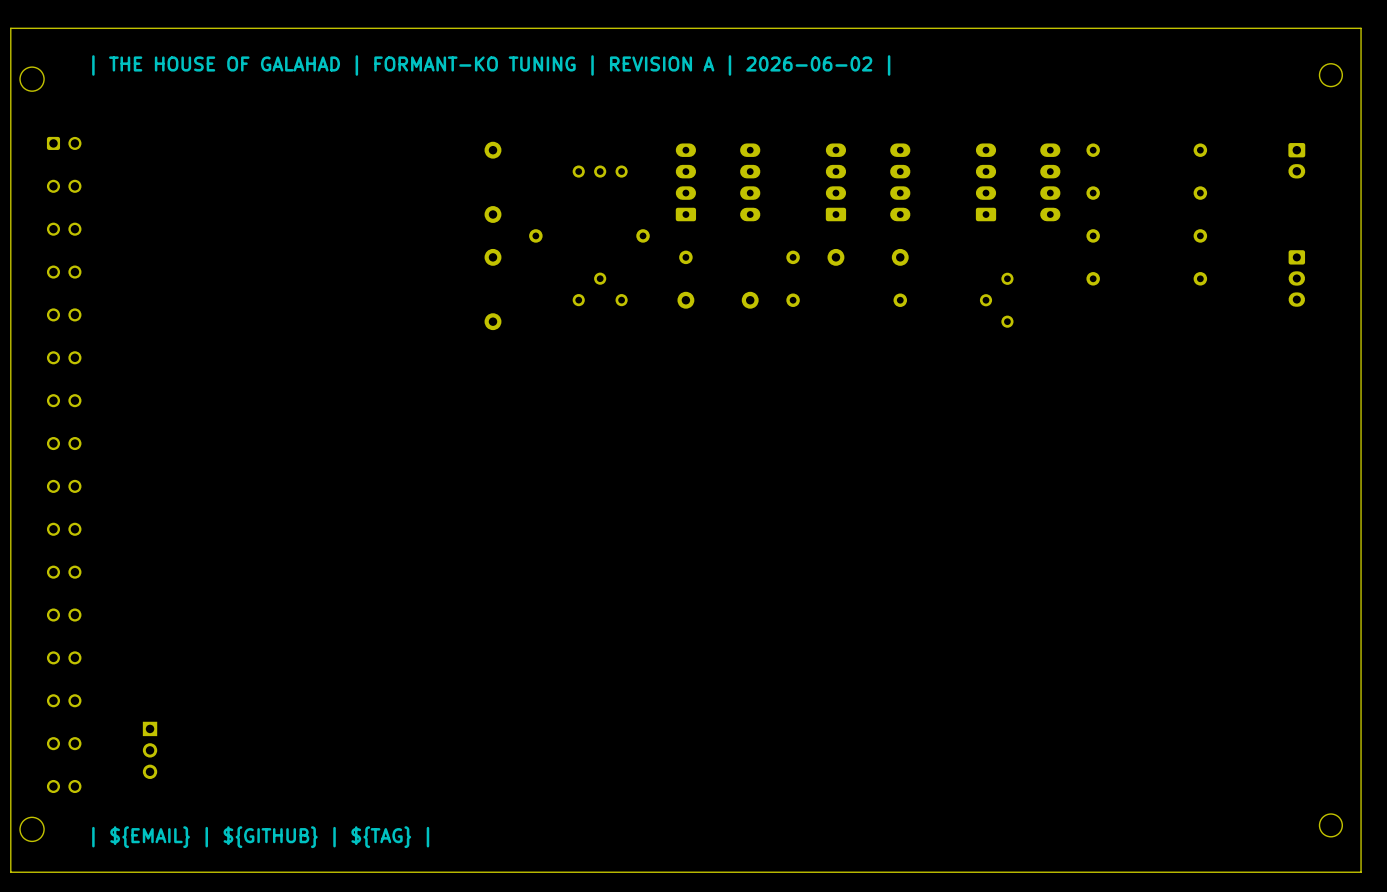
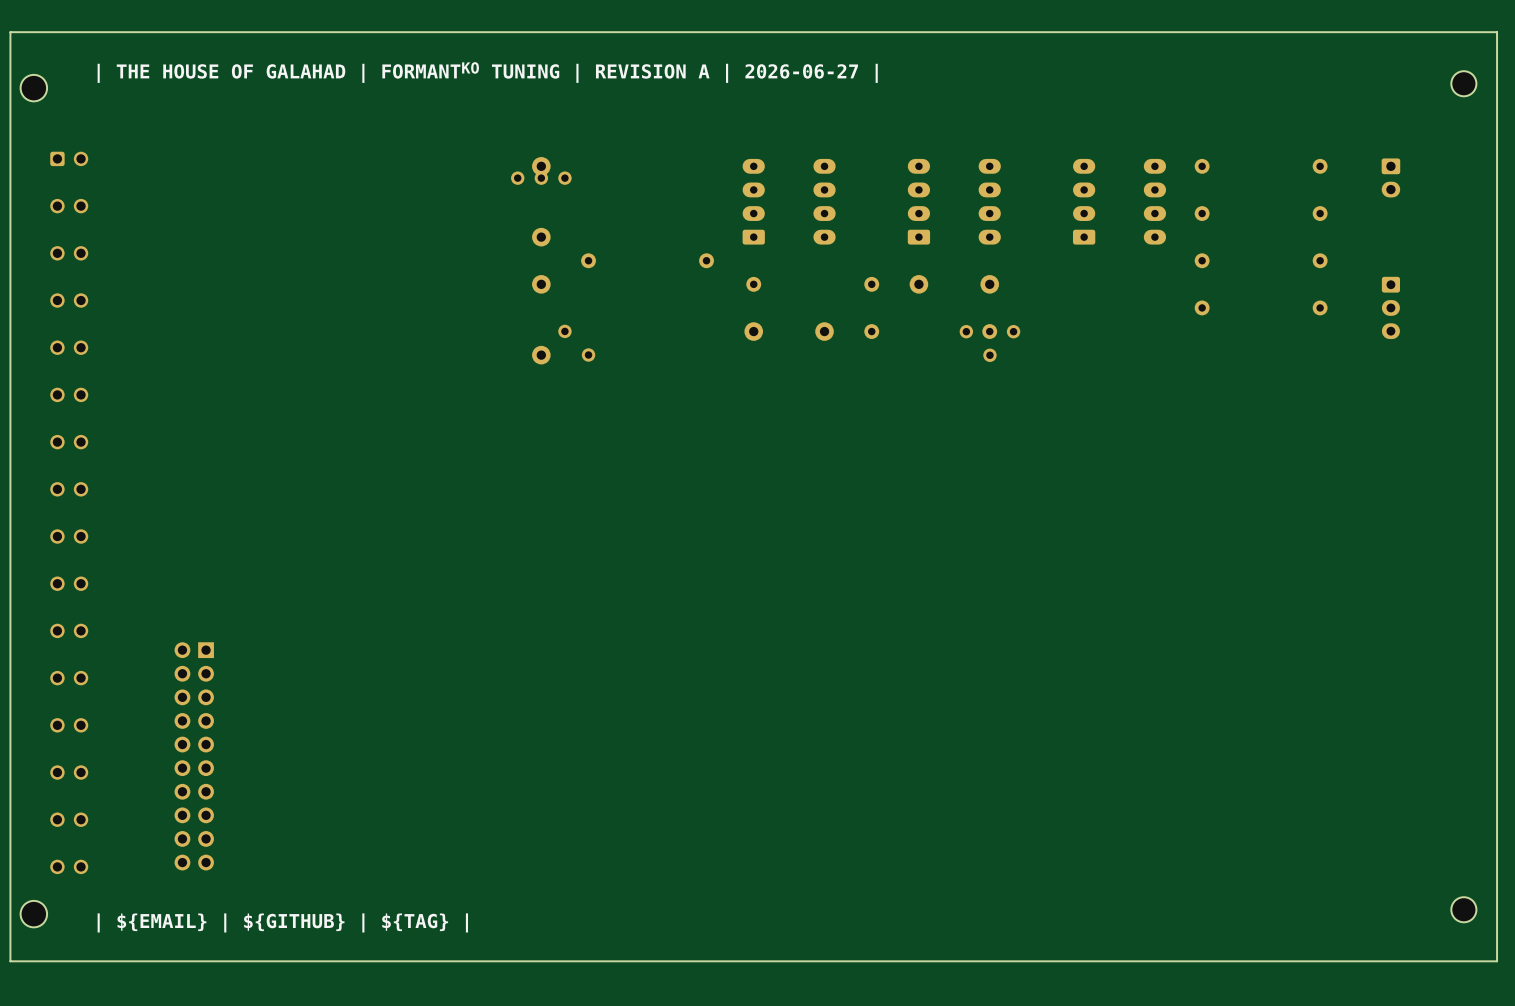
text: | THE HOUSE OF GALAHAD | FORMANT-KO TUNING | REVISION A | 2026-06-02 | (491, 65) -> | THE HOUSE OF GALAHAD | FORMANTKO TUNING | REVISION A | 2026-06-27 | (487, 72)
part position: (1296, 160) -> (1390, 177)
part position: (600, 171) -> (541, 178)
part position: (1296, 278) -> (1390, 307)
part position: (600, 289) -> (564, 343)
part rotation: 0° (996, 300) -> 90° counterclockwise (989, 343)
part position: (996, 300) -> (989, 343)
part: none -> (194, 756)
part: (150, 750) -> none

